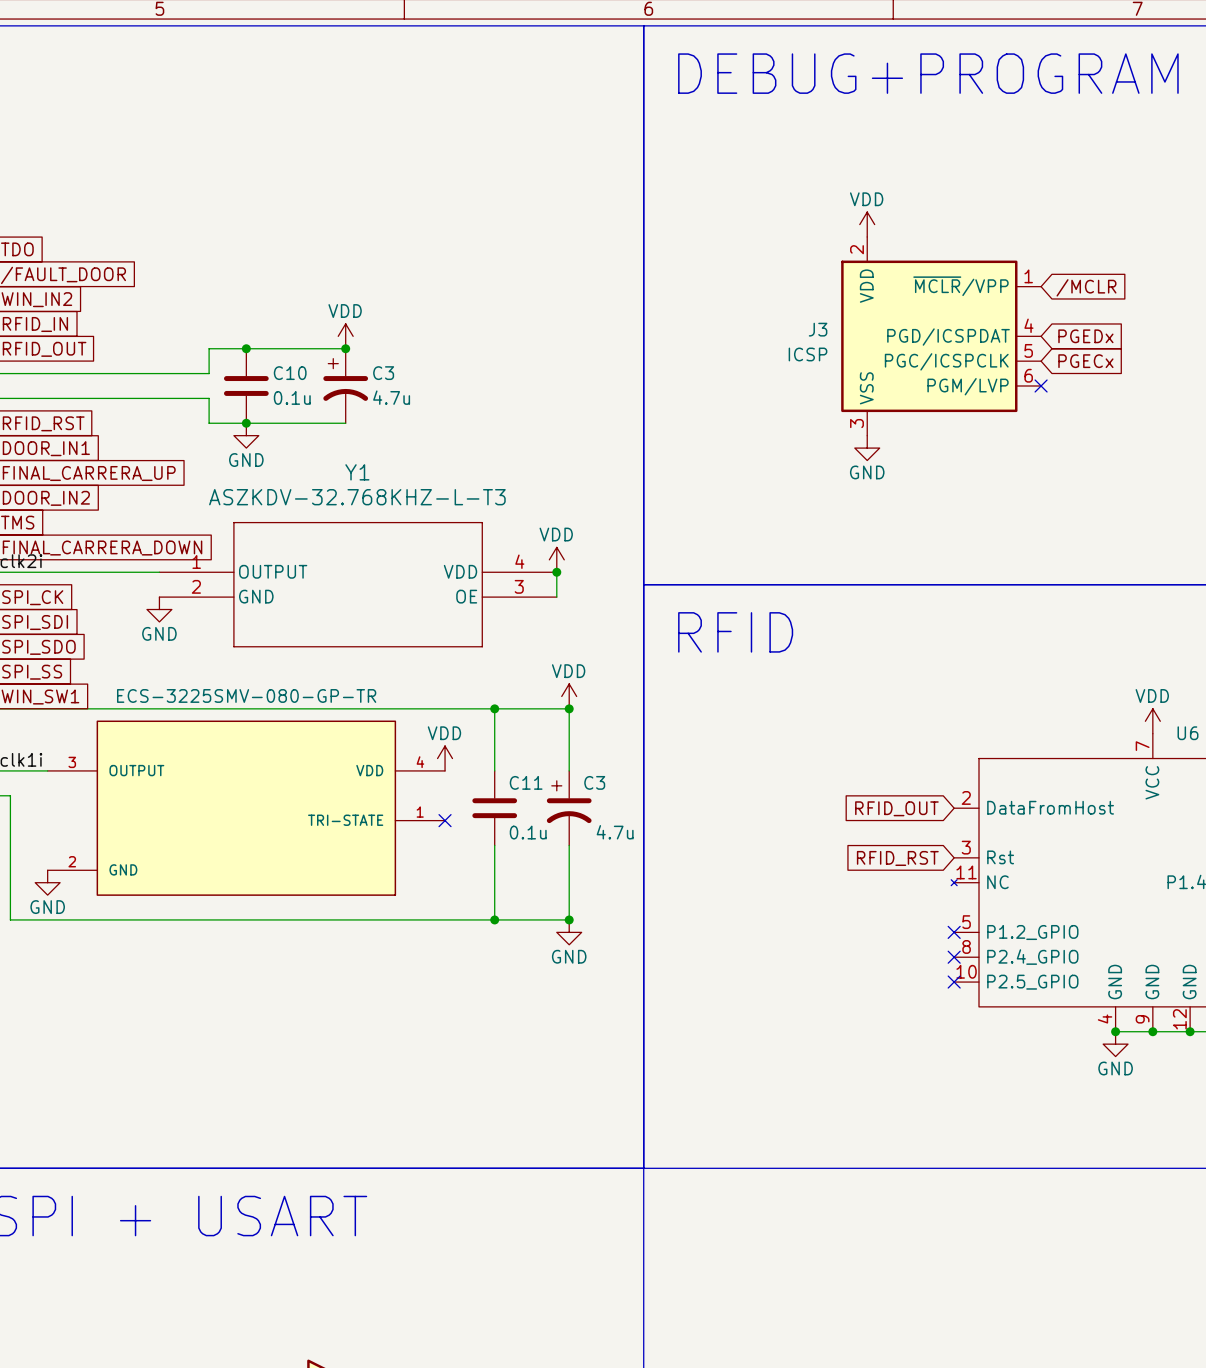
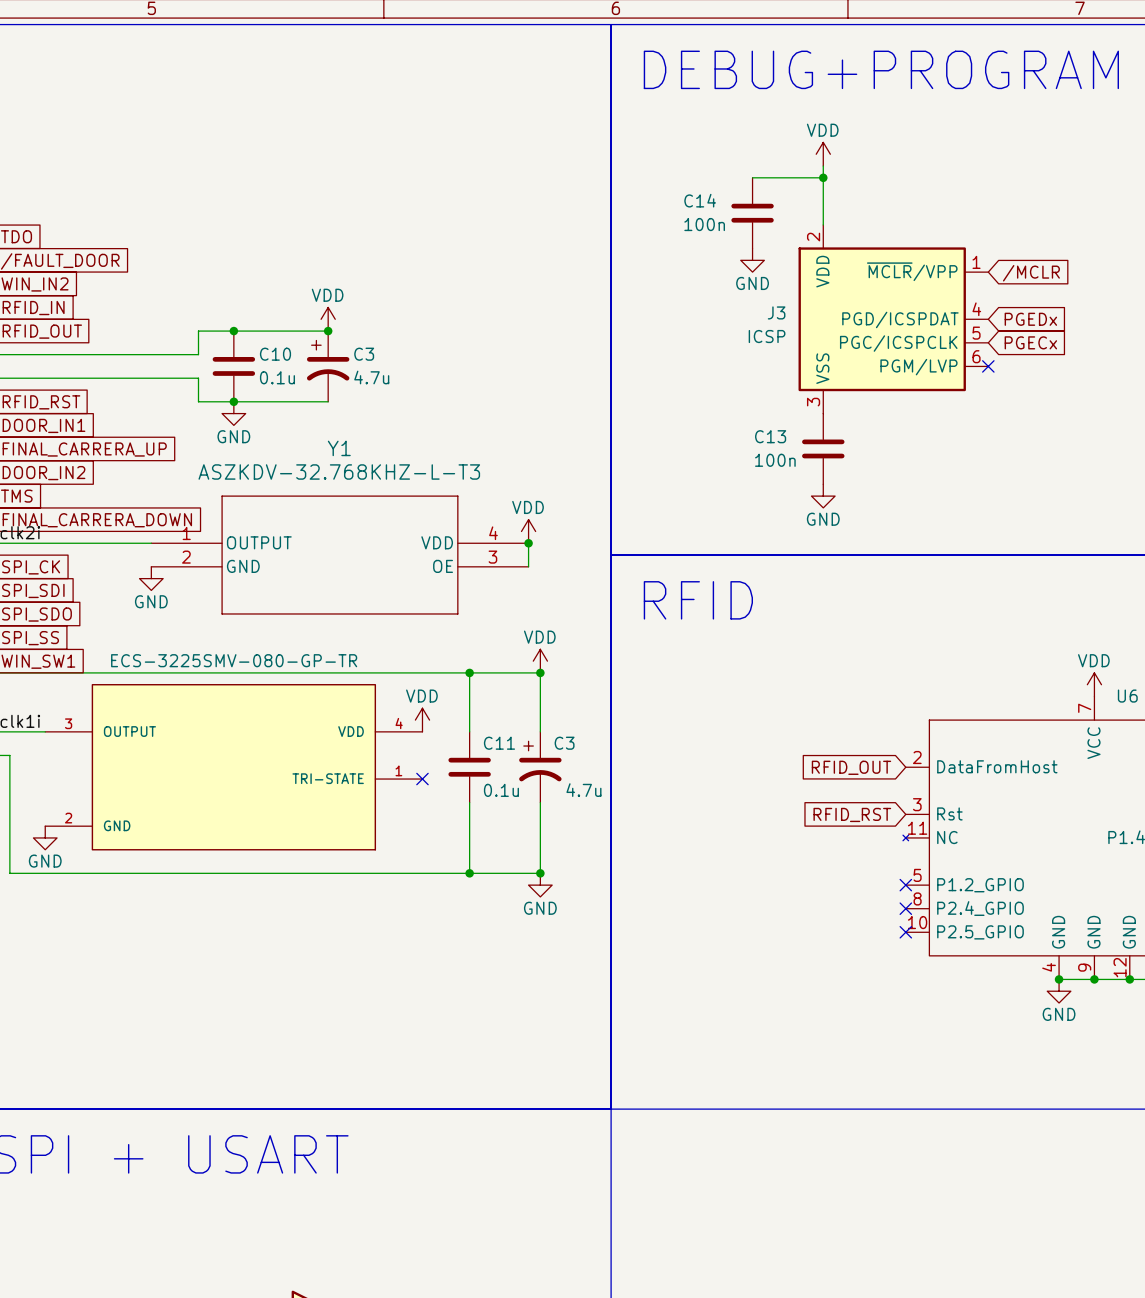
wire: none -> (823, 166) (823, 224)
wire: none -> (752, 177) (823, 177)
junction: none -> (823, 177)
C14: none -> 100n (752, 213)
power symbol position: VDD (867, 224) -> VDD (823, 154)
power symbol: none -> GND (752, 260)
power symbol position: GND (867, 448) -> GND (823, 496)
C13: none -> 100n (823, 448)

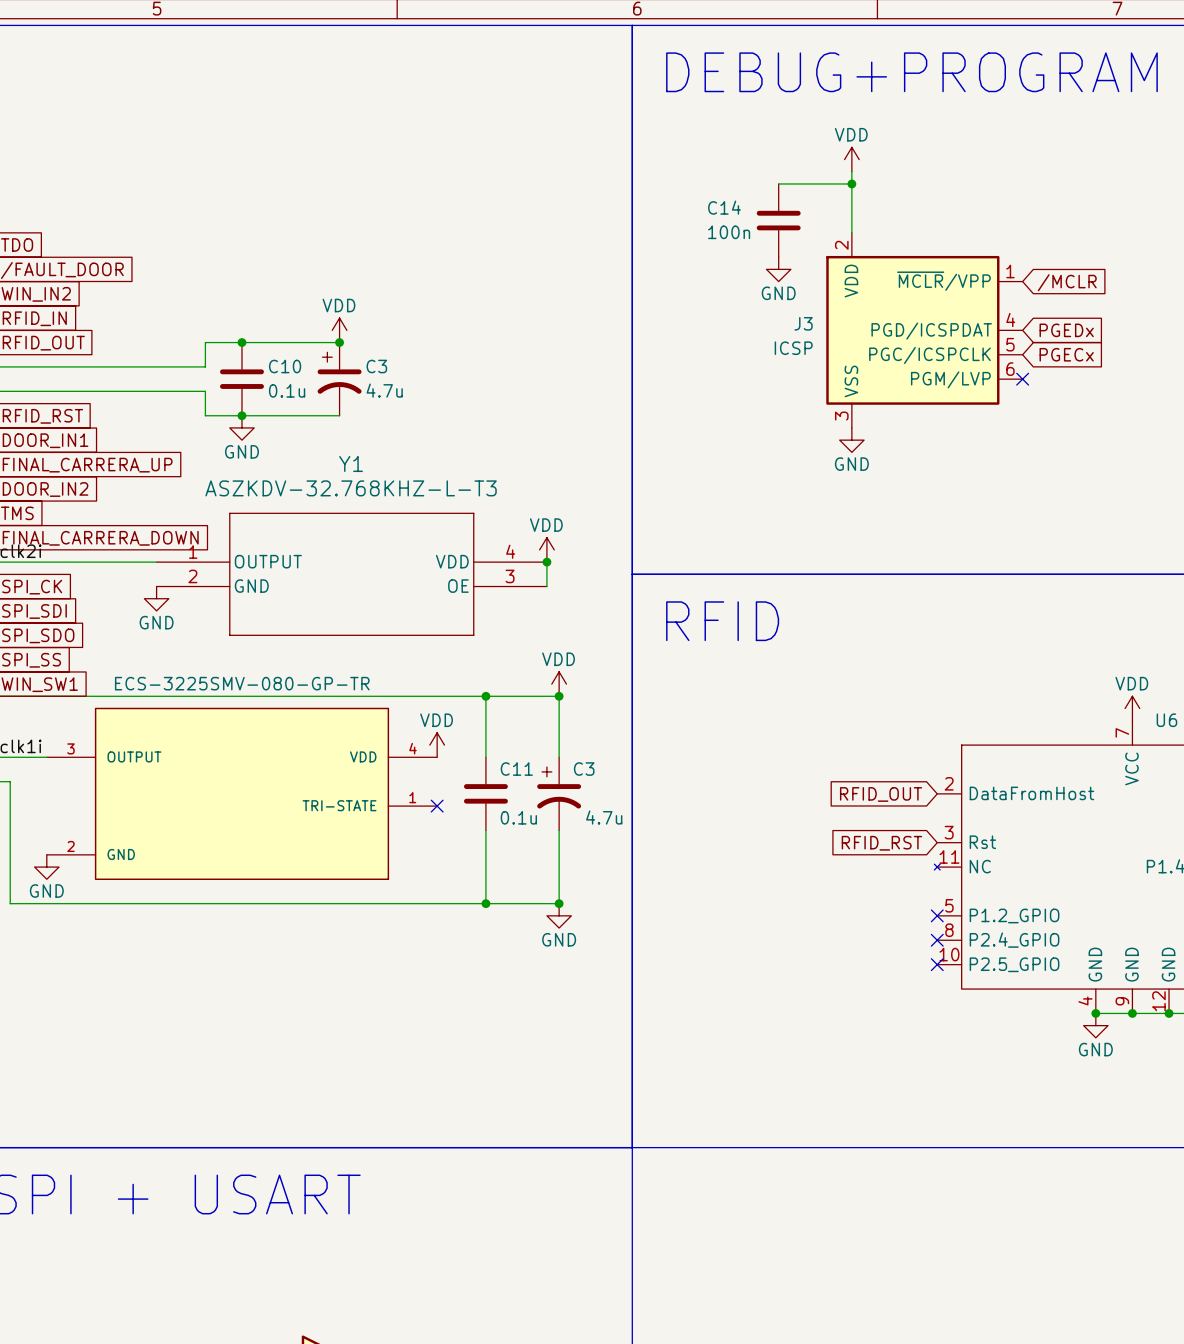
C13: 100n (823, 448) -> none
power symbol position: GND (823, 496) -> GND (851, 440)

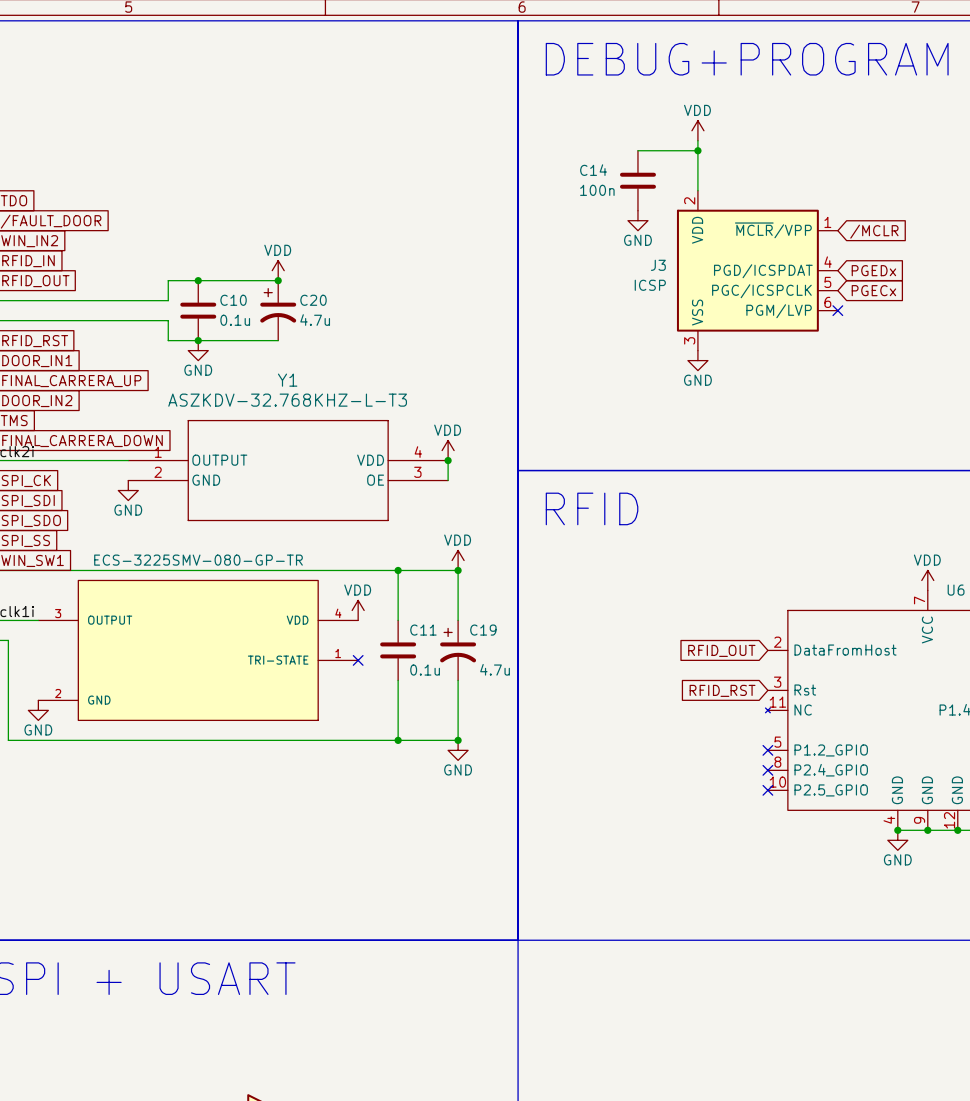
C3 name: C3 (376, 366) -> C20 (313, 300)
C3 name: C3 (584, 769) -> C19 (483, 630)

